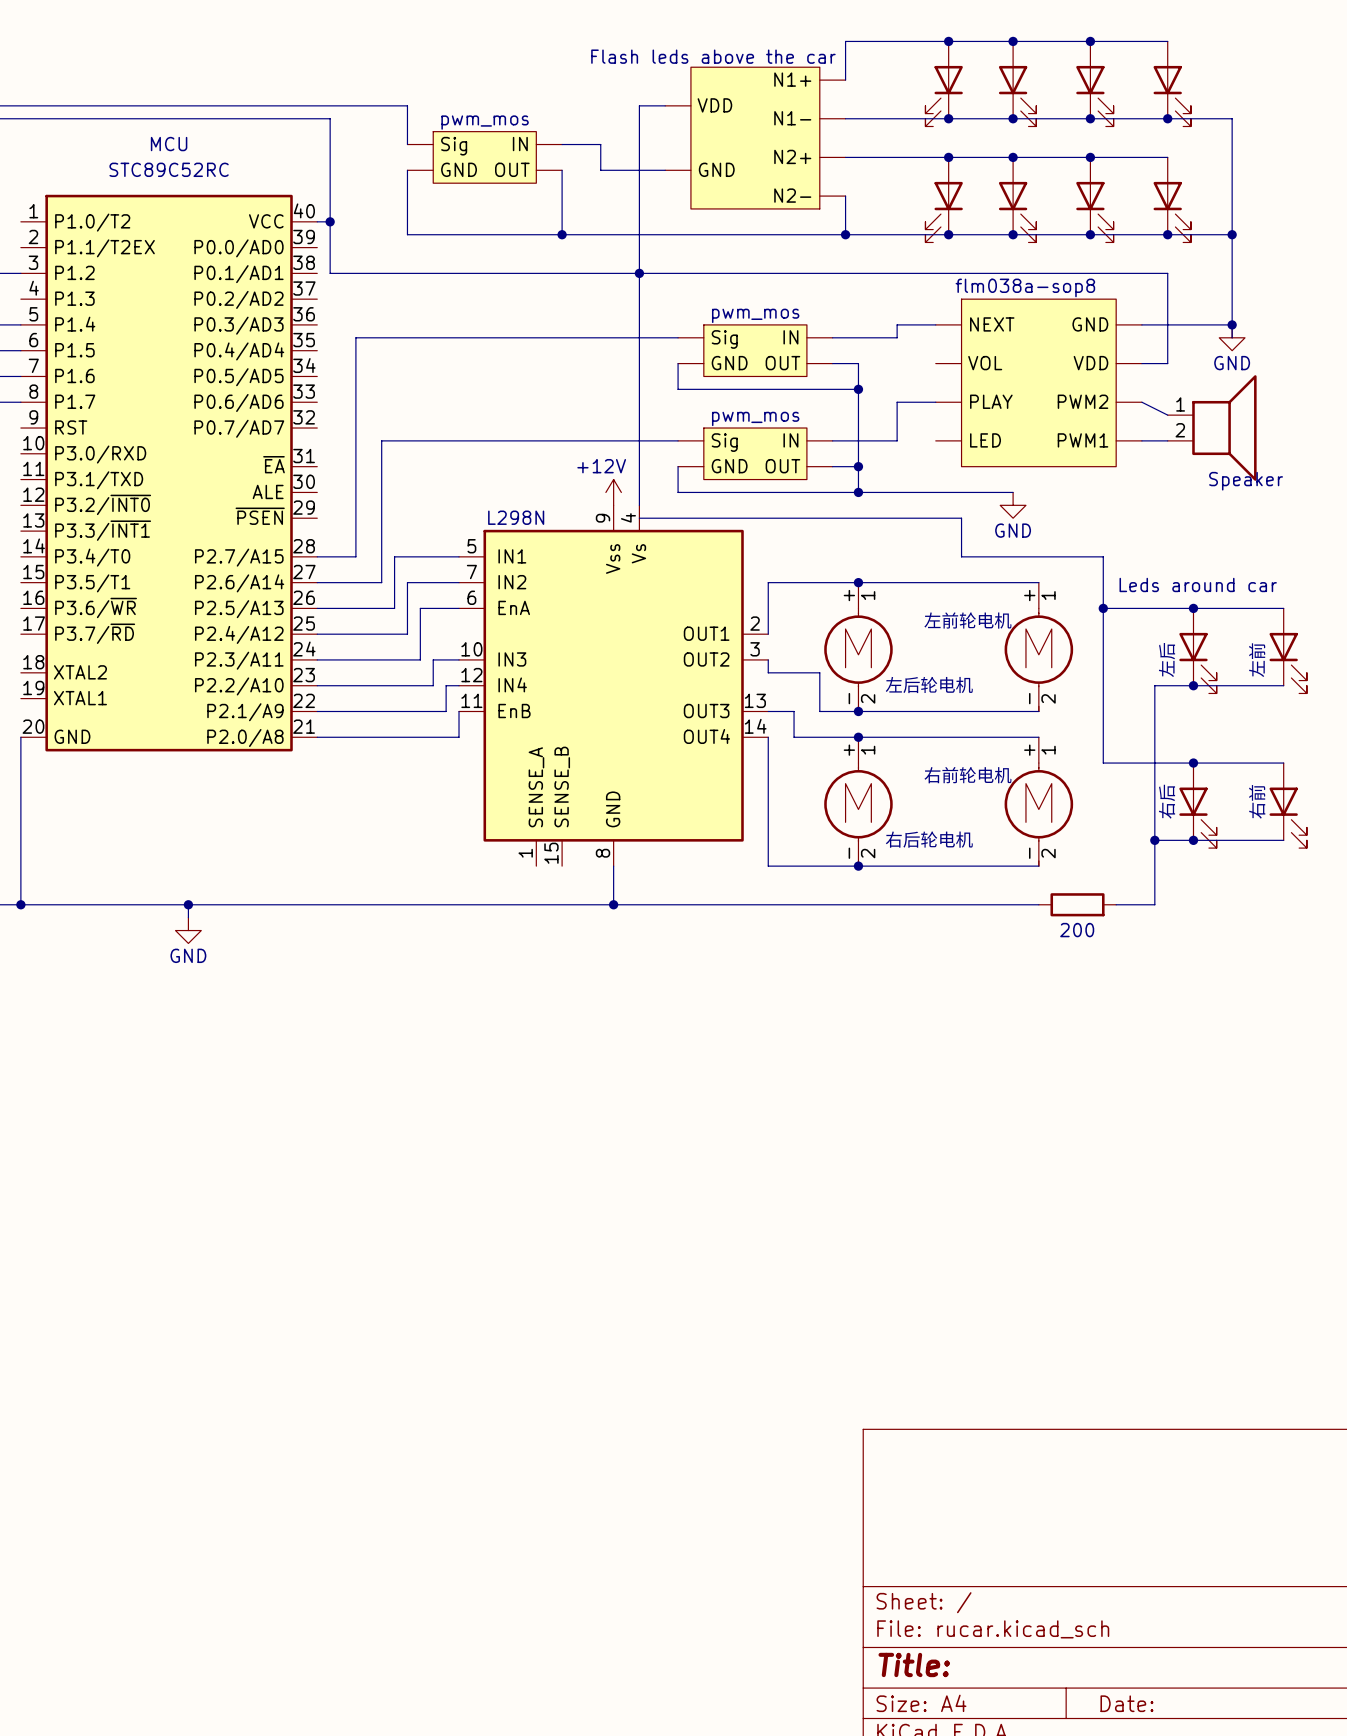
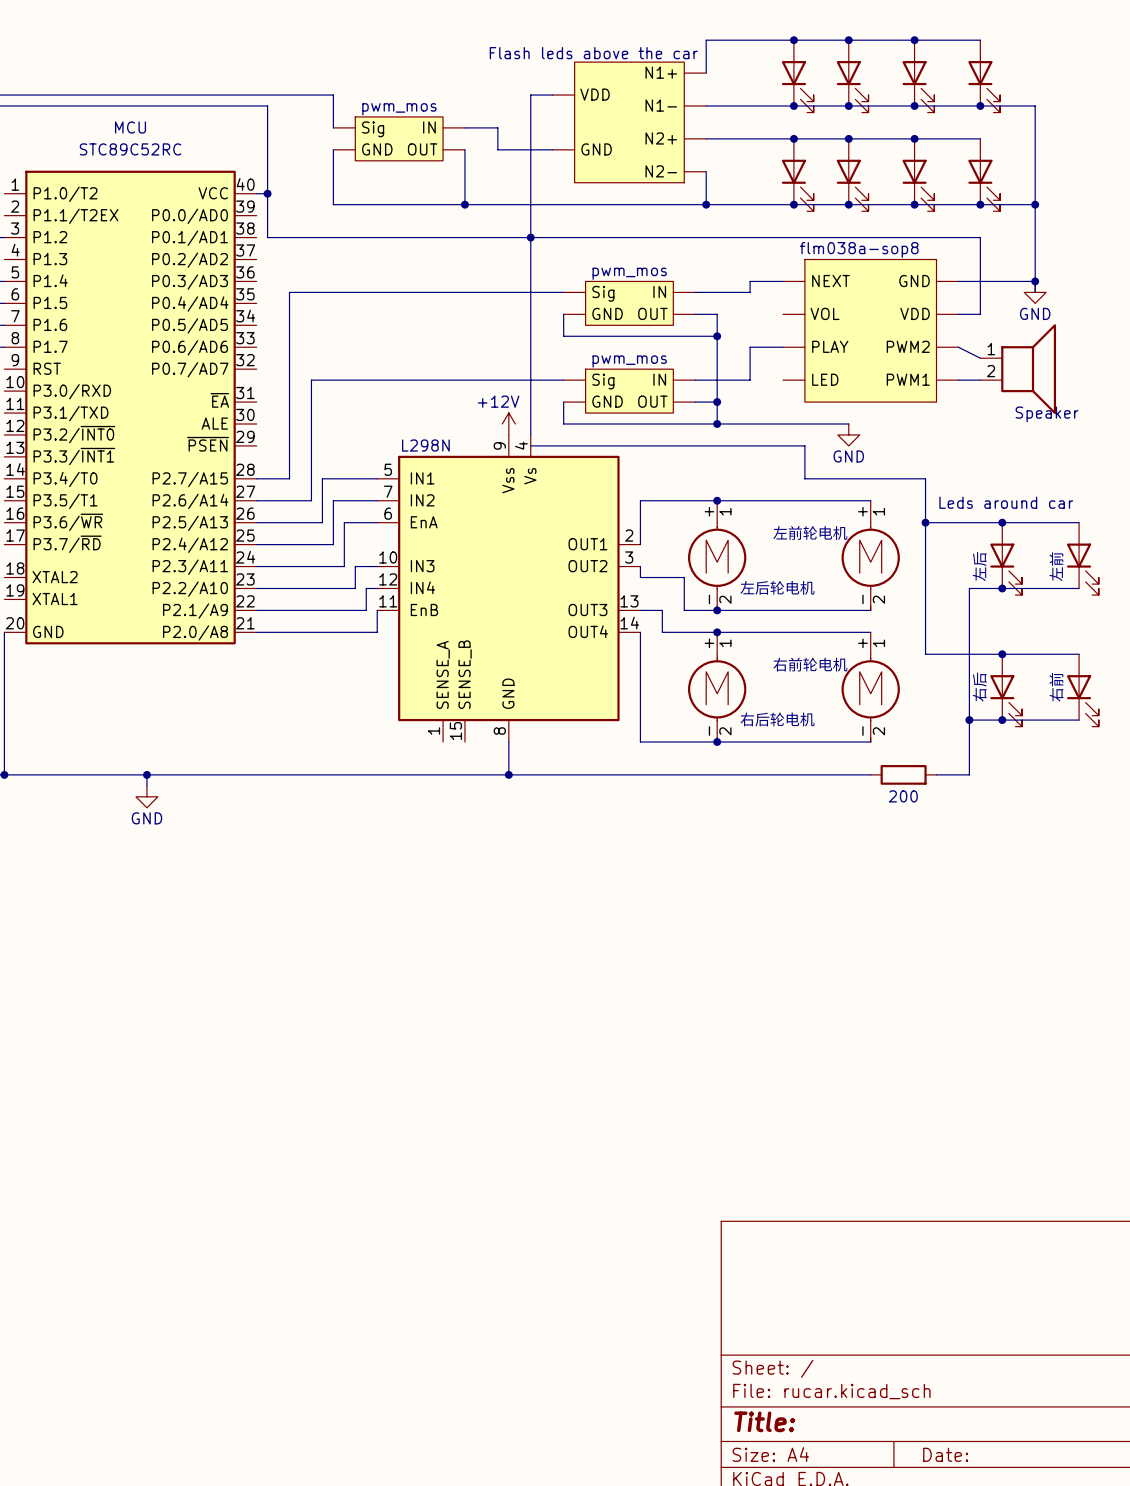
part flip: as is (944, 96) -> left-right (797, 86)
part flip: as is (944, 212) -> left-right (797, 185)

